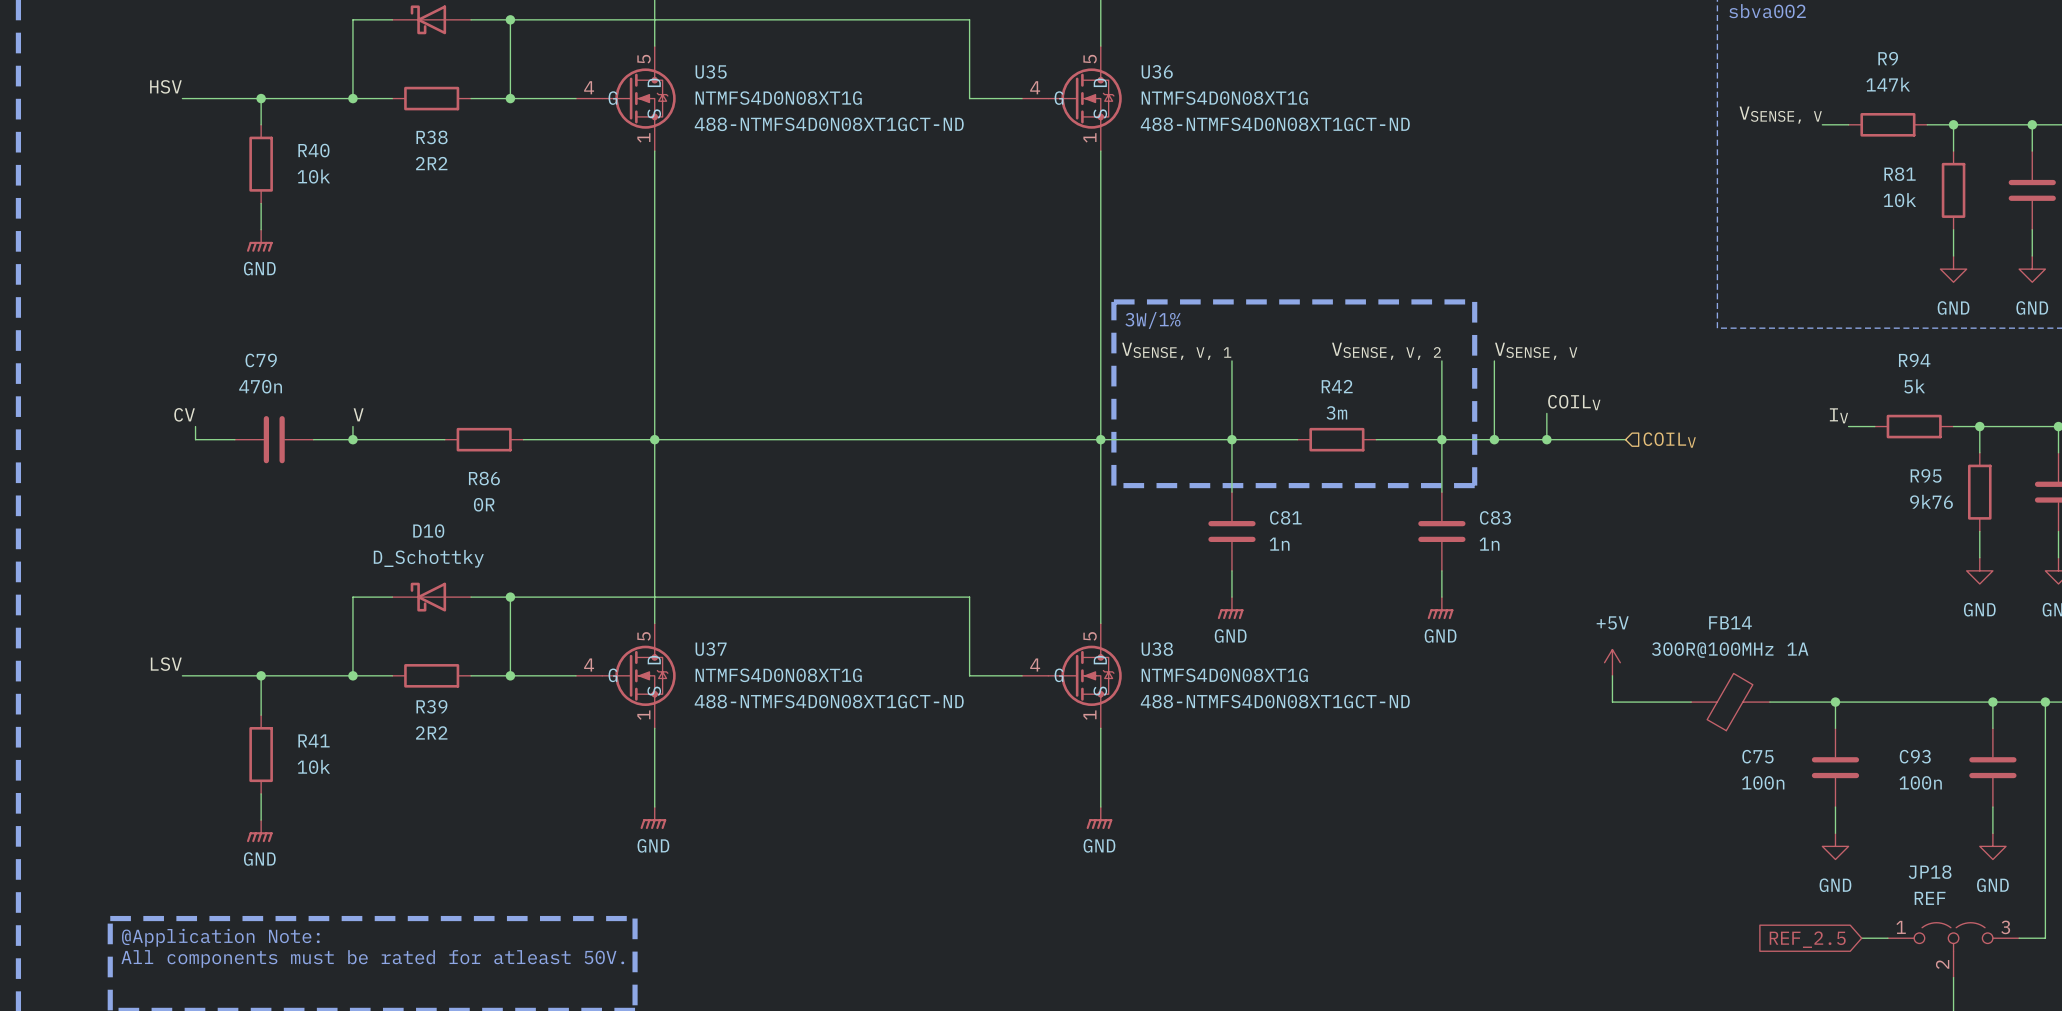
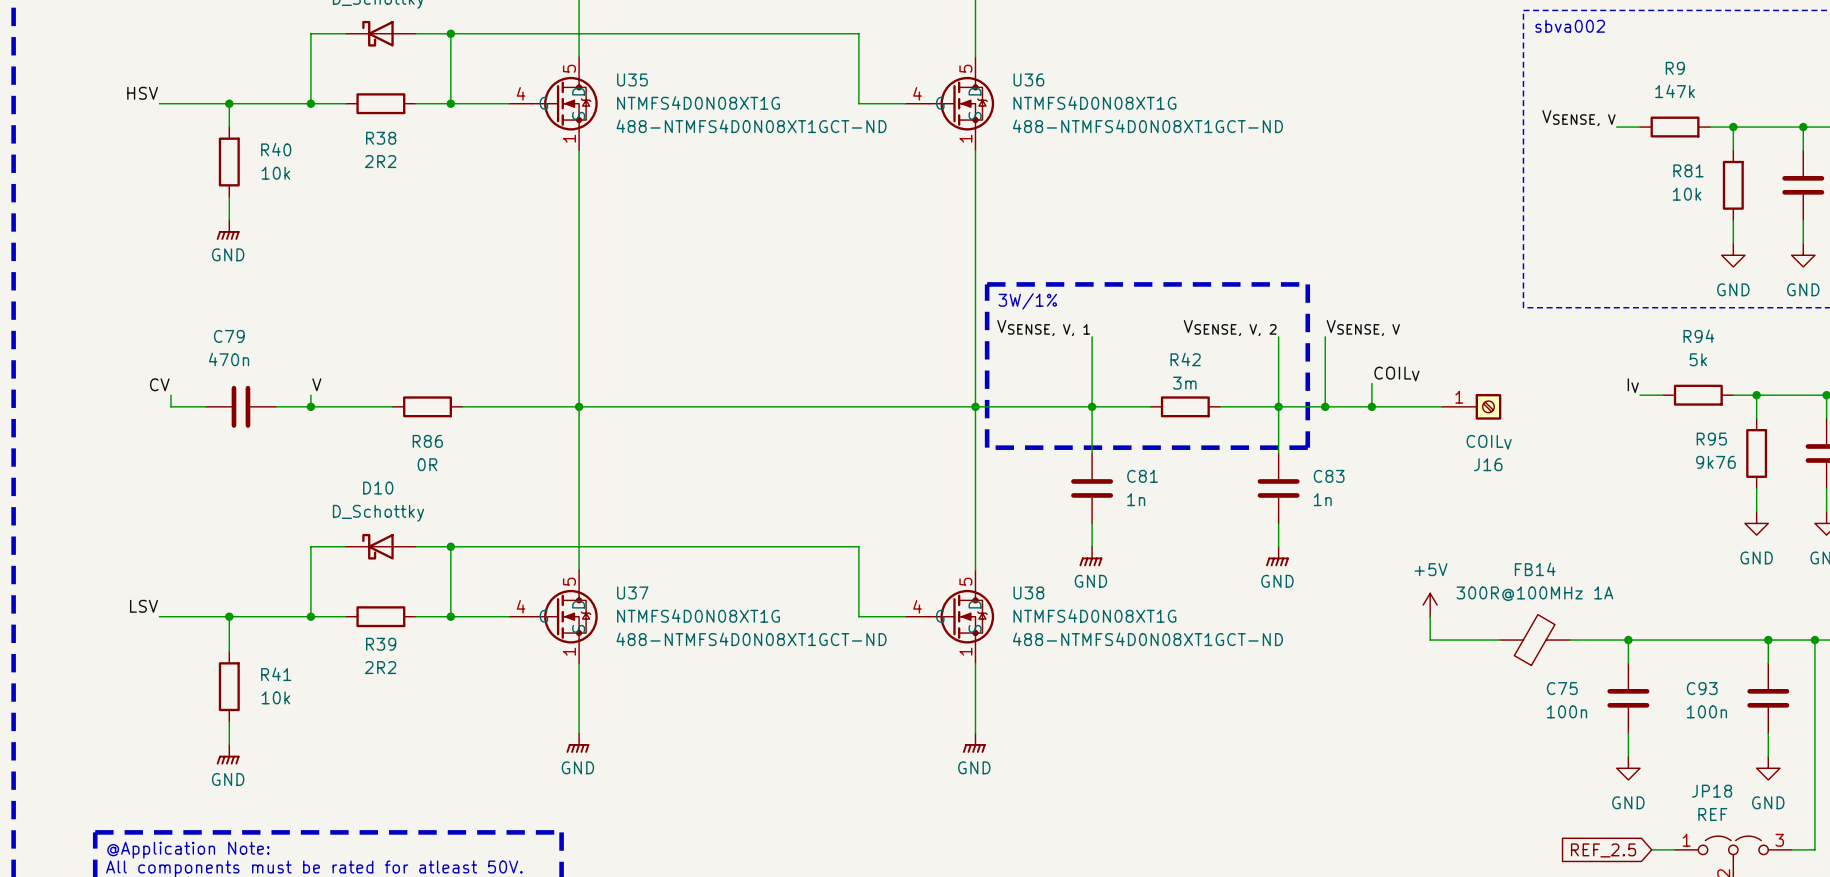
J16: none -> COILV (1471, 406)
hierarchical label: COILV (1669, 440) -> none

